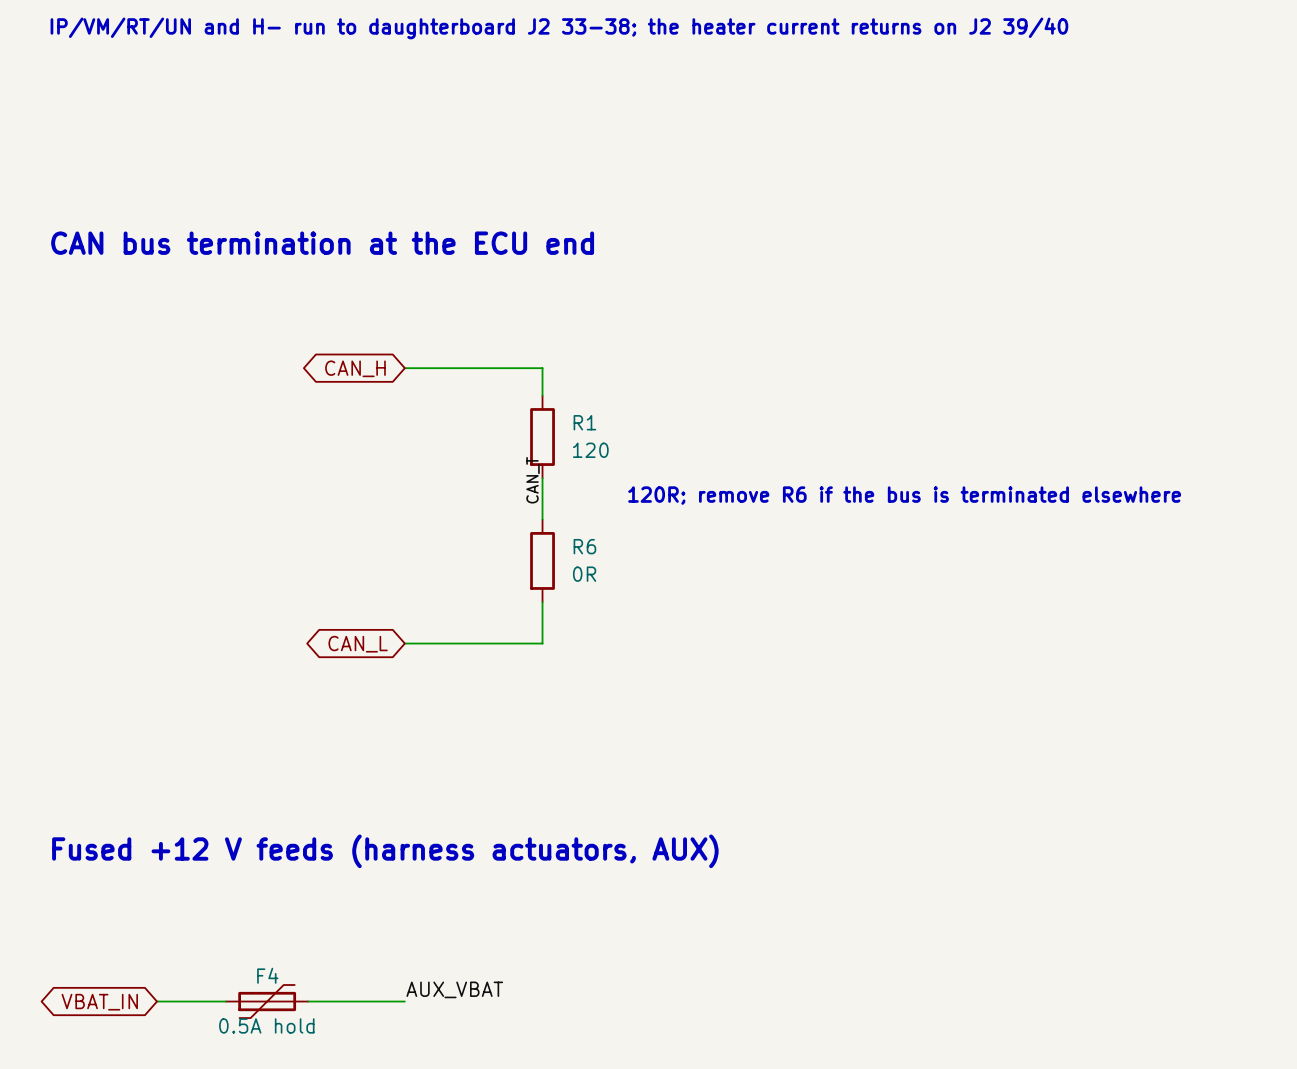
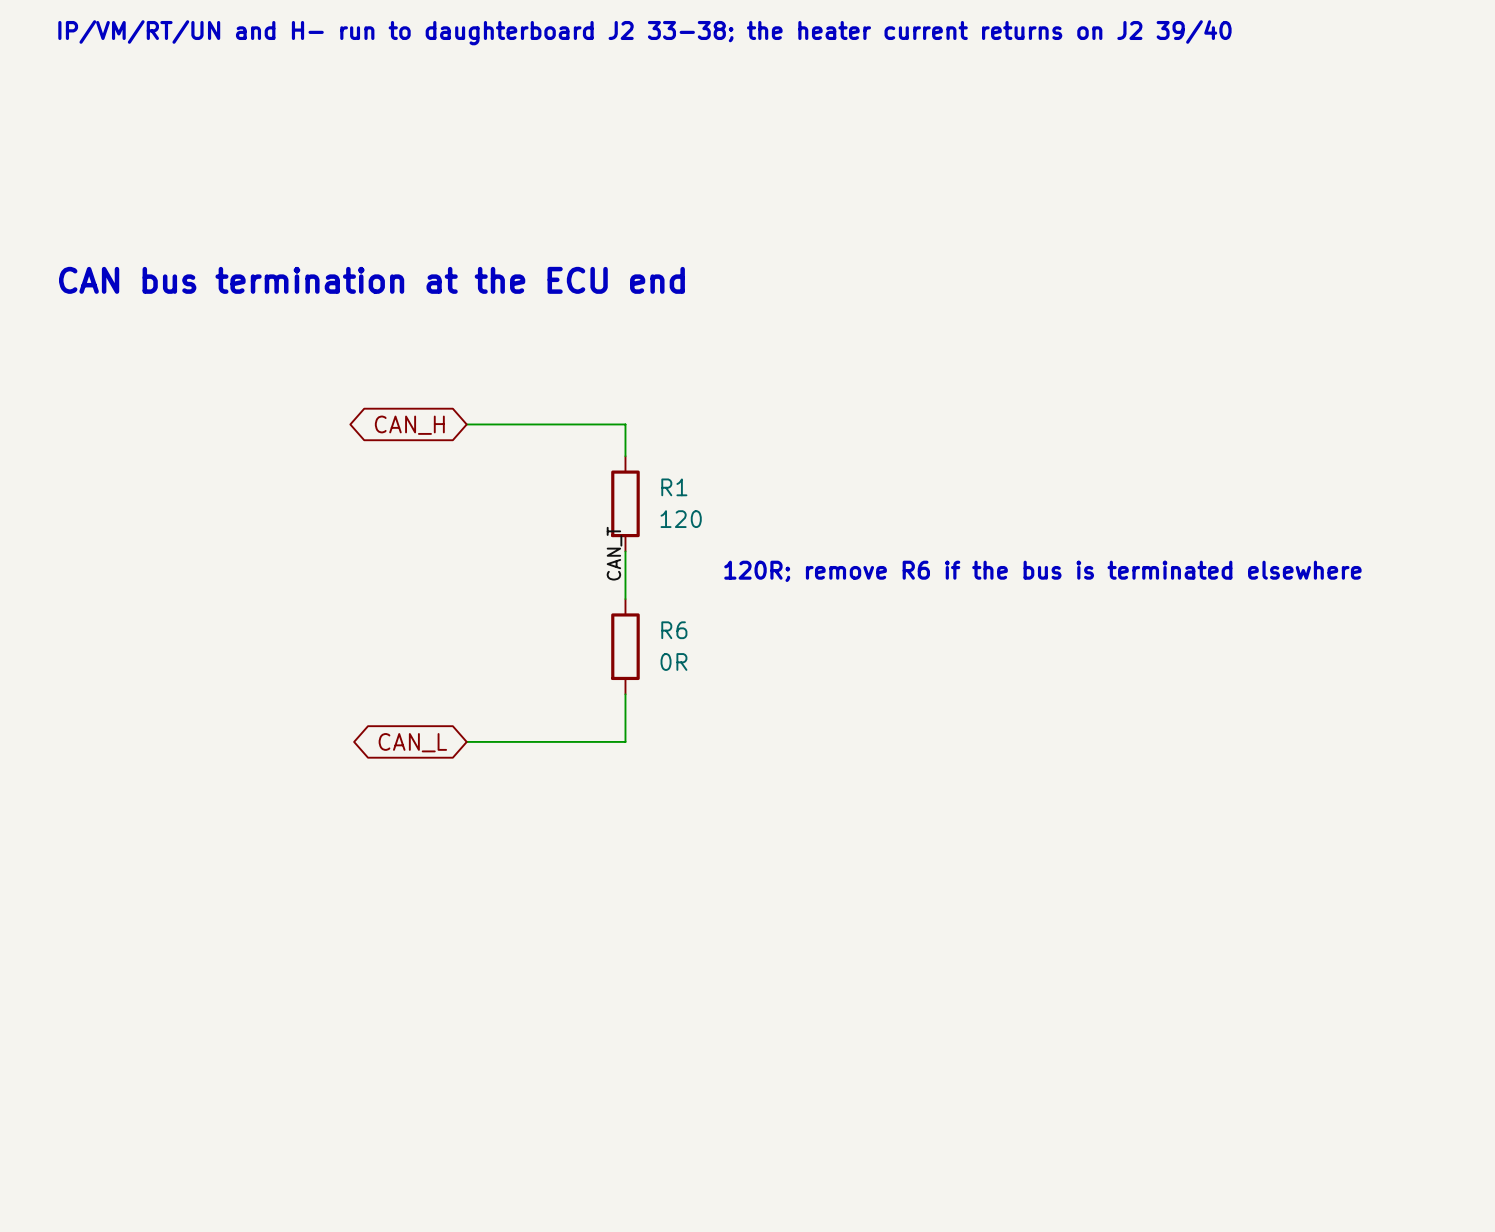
text: Fused +12 V feeds (harness actuators, AUX) (385, 851) -> none
label: AUX_VBAT (454, 989) -> none
wire: (157, 1001) (225, 1001) -> none
F4: 0.5A hold (267, 1001) -> none
wire: (308, 1001) (404, 1001) -> none
global label: VBAT_IN (99, 1002) -> none

